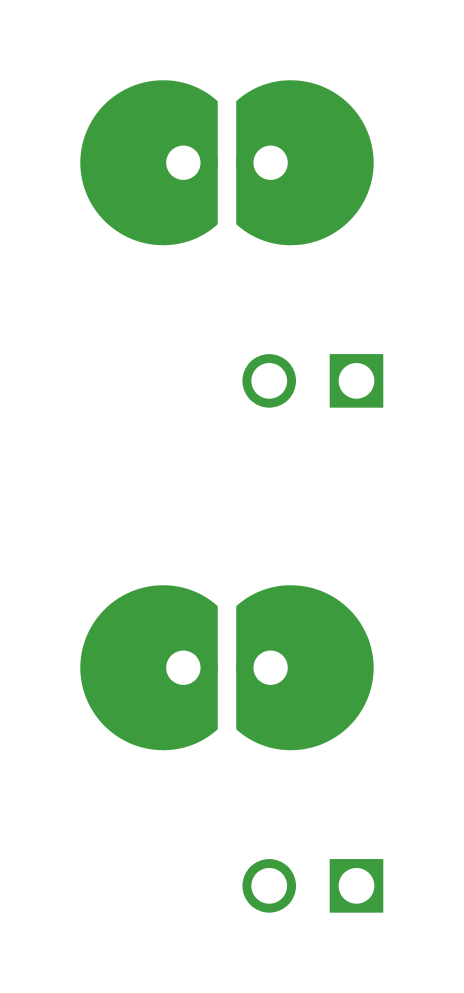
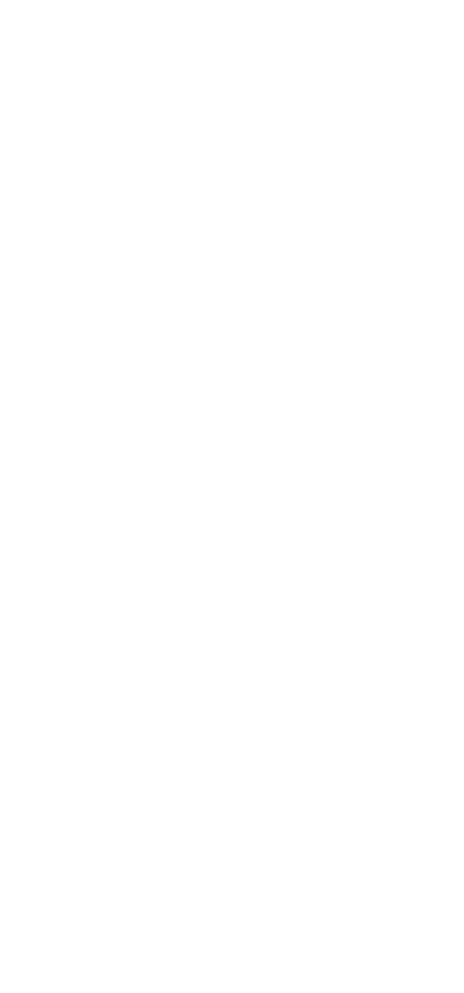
part: (226, 162) -> none
part: (312, 380) -> none
part: (226, 667) -> none
part: (312, 885) -> none

